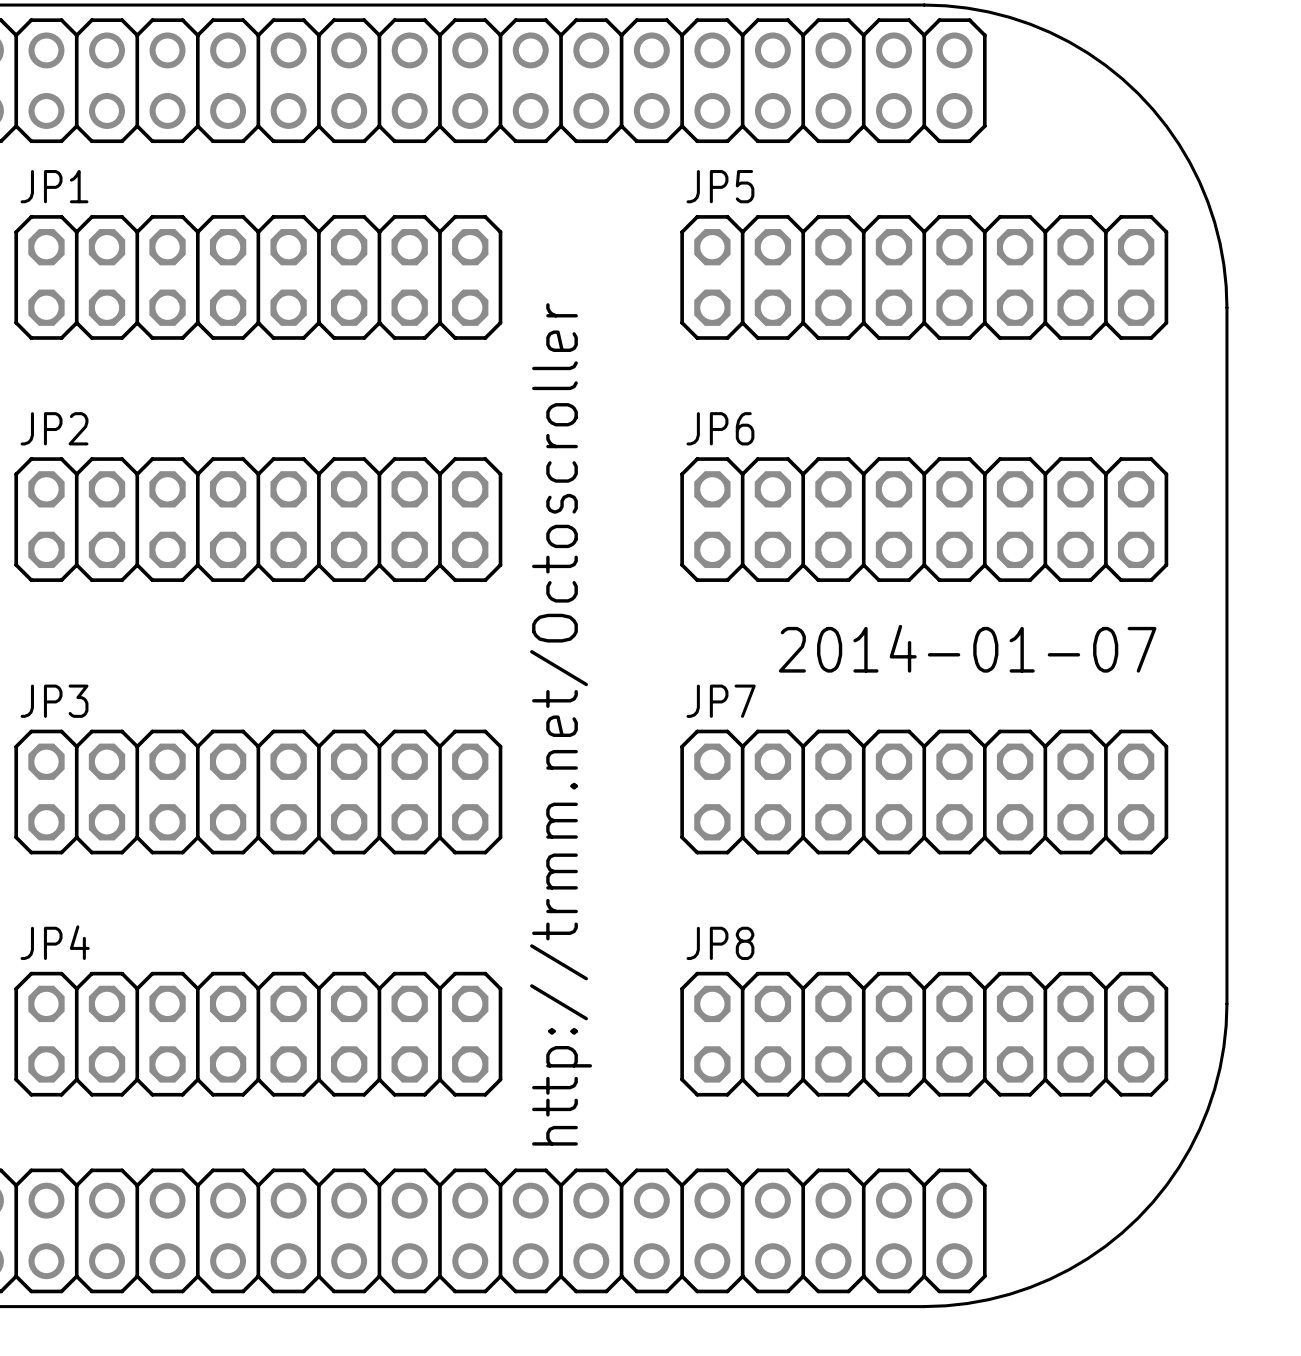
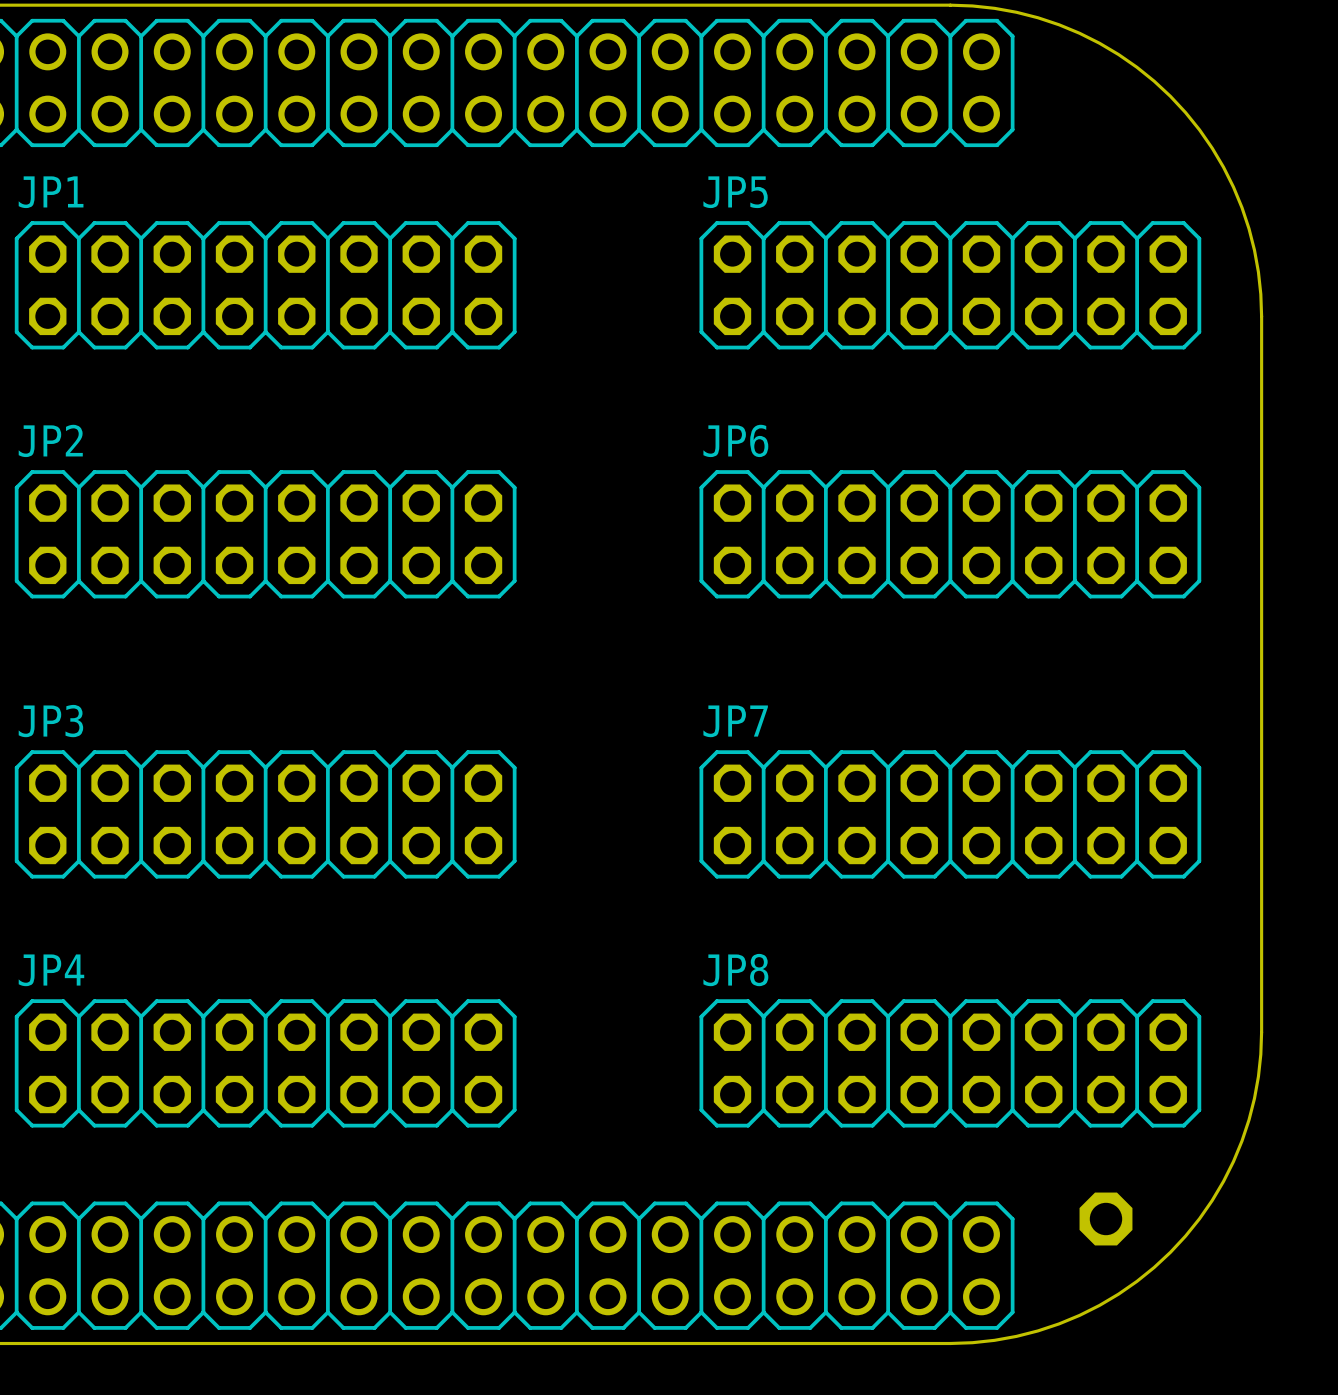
text: 2014-01-07 (967, 648) -> none
text: http://trmm.net/Octoscroller (561, 724) -> none
part: none -> (1105, 1219)

